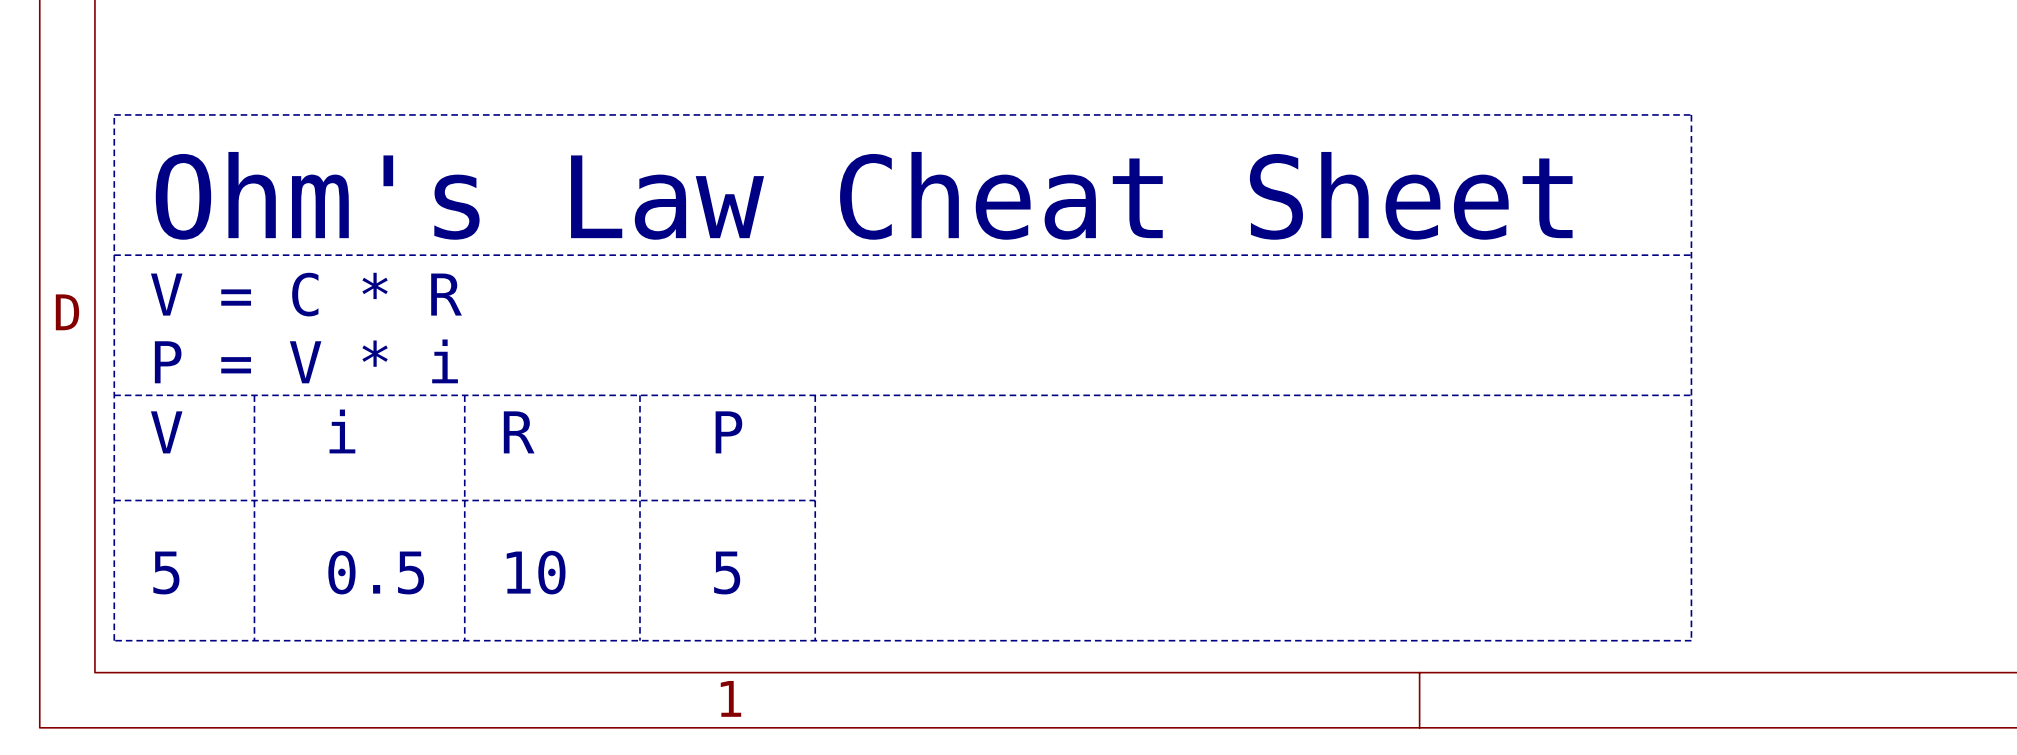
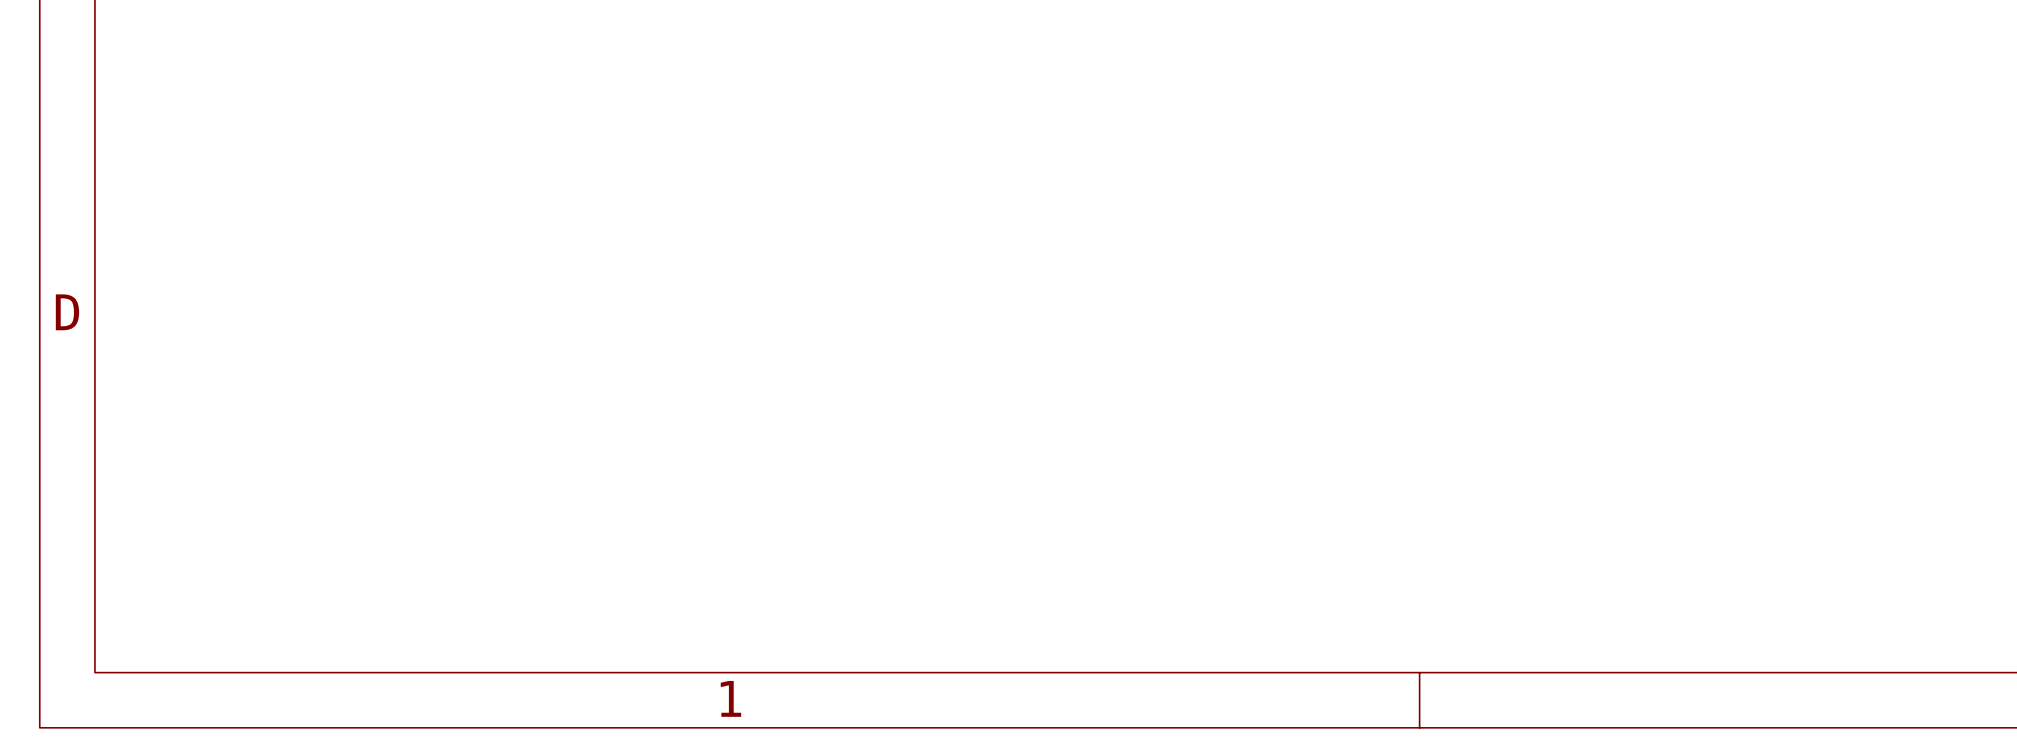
line: (114, 114) (1691, 114) (1691, 640) (114, 640) (114, 114) -> none
text: Ohm's Law Cheat Sheet (864, 195) -> none
line: (114, 255) (1691, 255) -> none
text: V = C * R (306, 294) -> none
text: P = V * i (306, 361) -> none
line: (114, 395) (1691, 395) -> none
line: (254, 395) (254, 640) -> none
line: (464, 395) (464, 640) -> none
line: (639, 395) (639, 640) -> none
line: (815, 395) (815, 640) -> none
text: i (342, 431) -> none
text: V (166, 432) -> none
text: R (519, 432) -> none
text: P (728, 432) -> none
line: (114, 500) (815, 500) -> none
text: 5 (166, 572) -> none
text: 0.5 (376, 572) -> none
text: 10 (536, 572) -> none
text: 5 (727, 572) -> none

